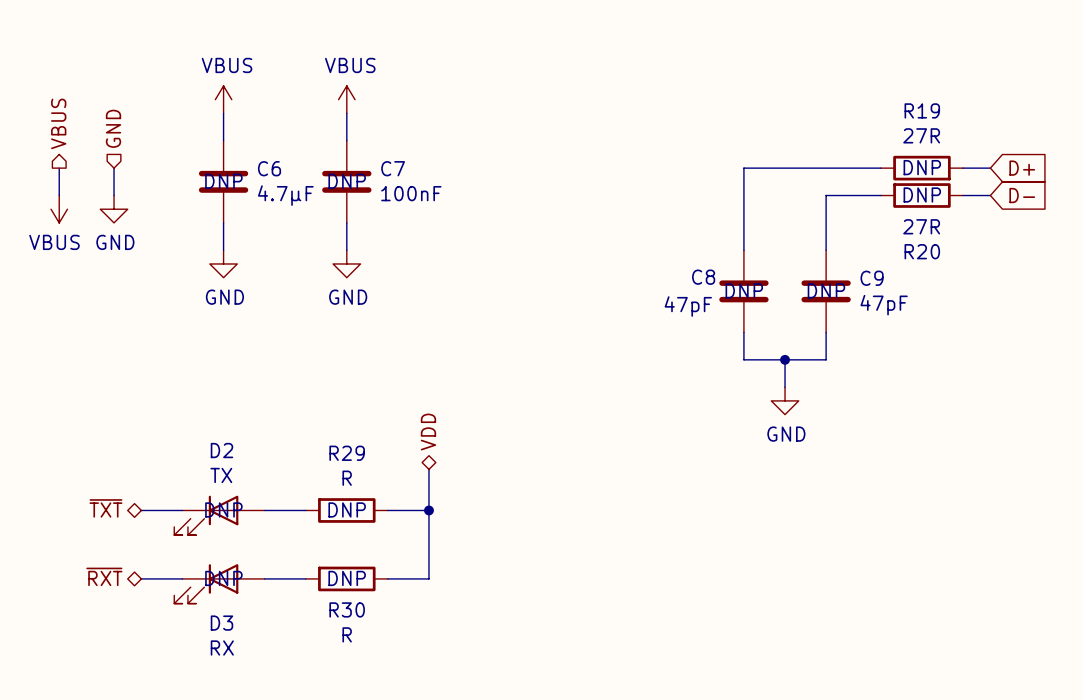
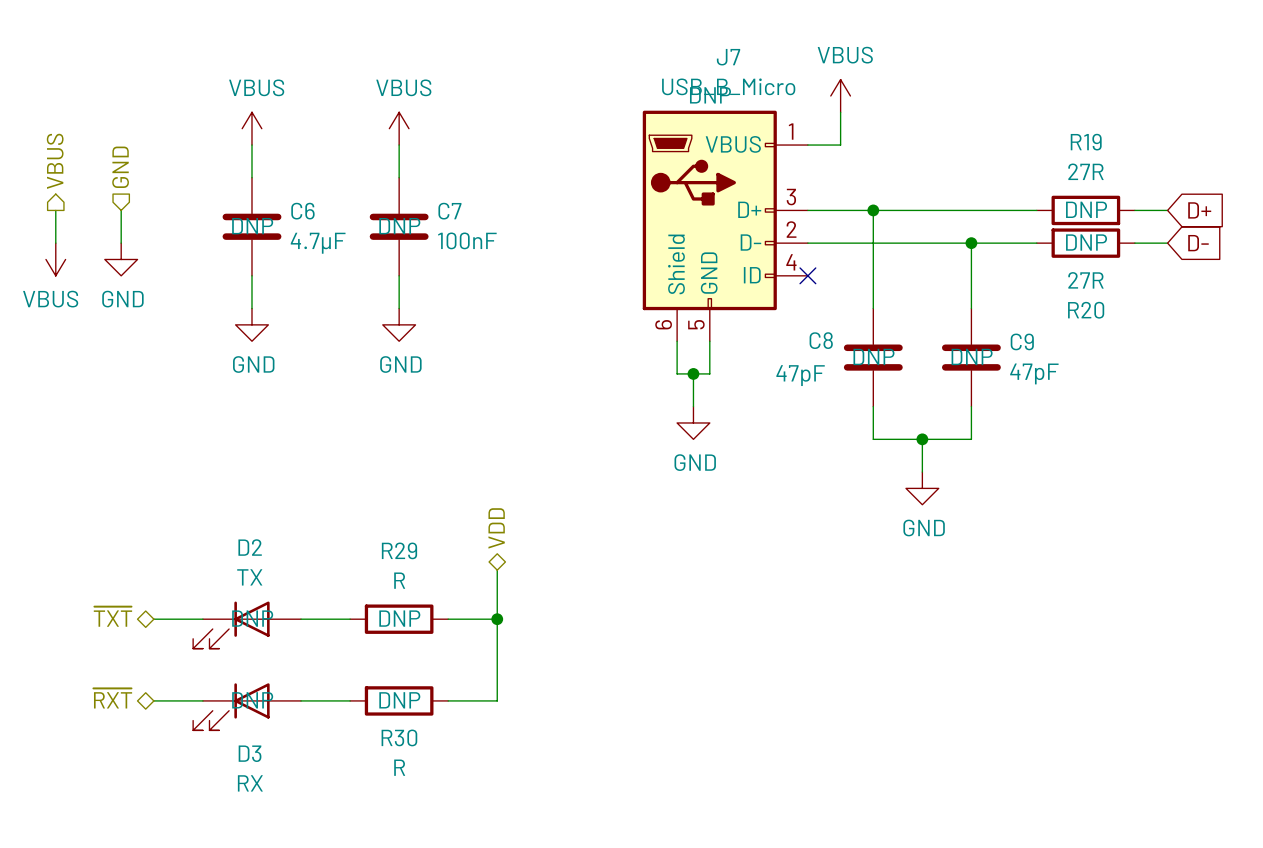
power symbol: none -> VBUS (840, 95)
wire: none -> (840, 112) (840, 145) (807, 145)
wire: none -> (807, 210) (873, 210)
junction: none -> (873, 210)
J7: none -> USB_B_Micro (725, 225)
wire: none -> (807, 243) (971, 243)
junction: none -> (971, 243)
no-connect mark: none -> (807, 275)
wire: none -> (677, 341) (677, 373) (709, 373) (709, 341)
wire: none -> (693, 373) (693, 406)
junction: none -> (693, 373)
power symbol: none -> GND (693, 422)

